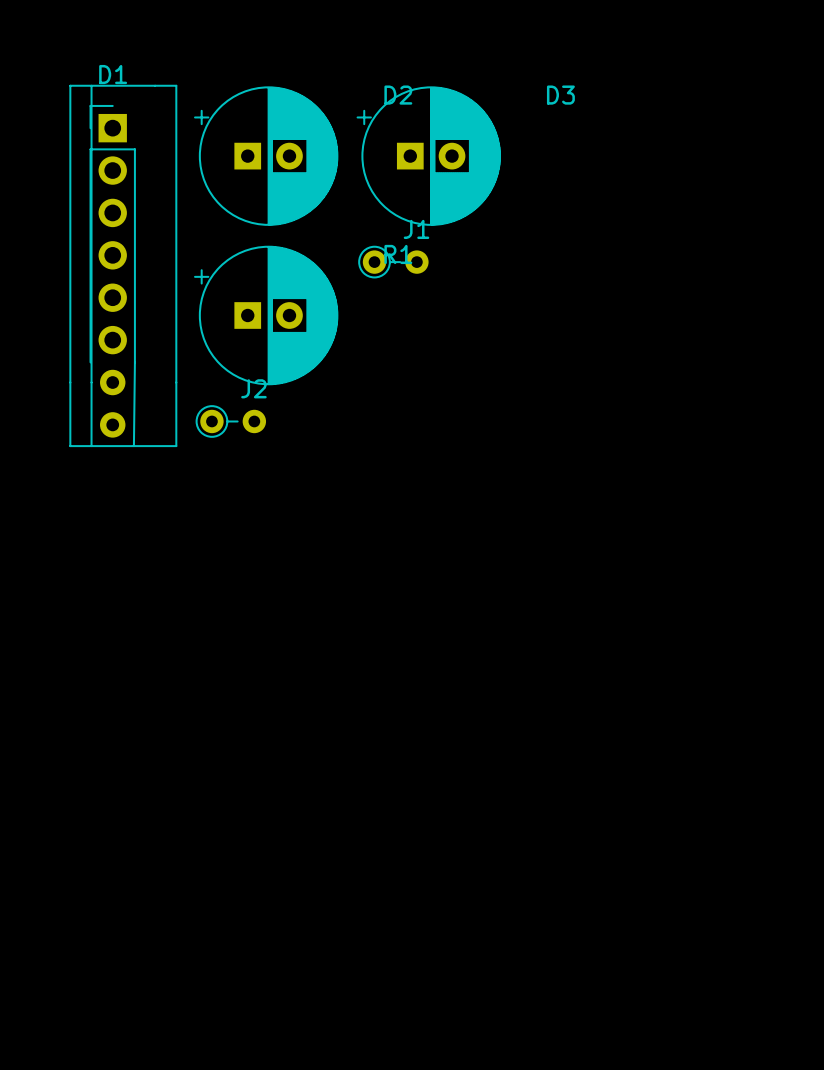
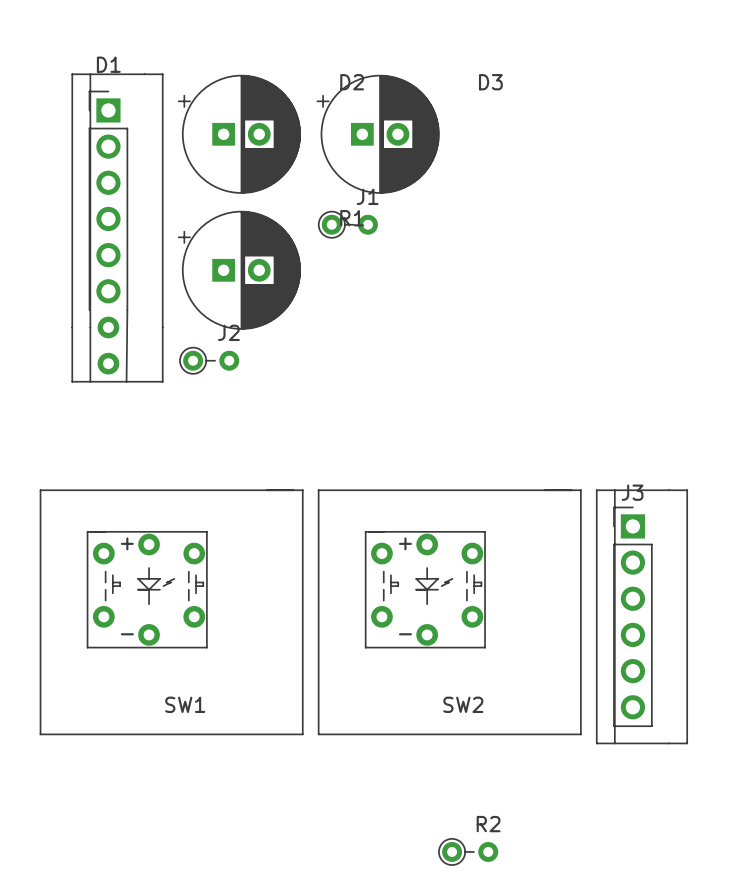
SW1: none -> (171, 612)
SW2: none -> (449, 612)
J3: none -> (641, 616)
R2: none -> (468, 851)

